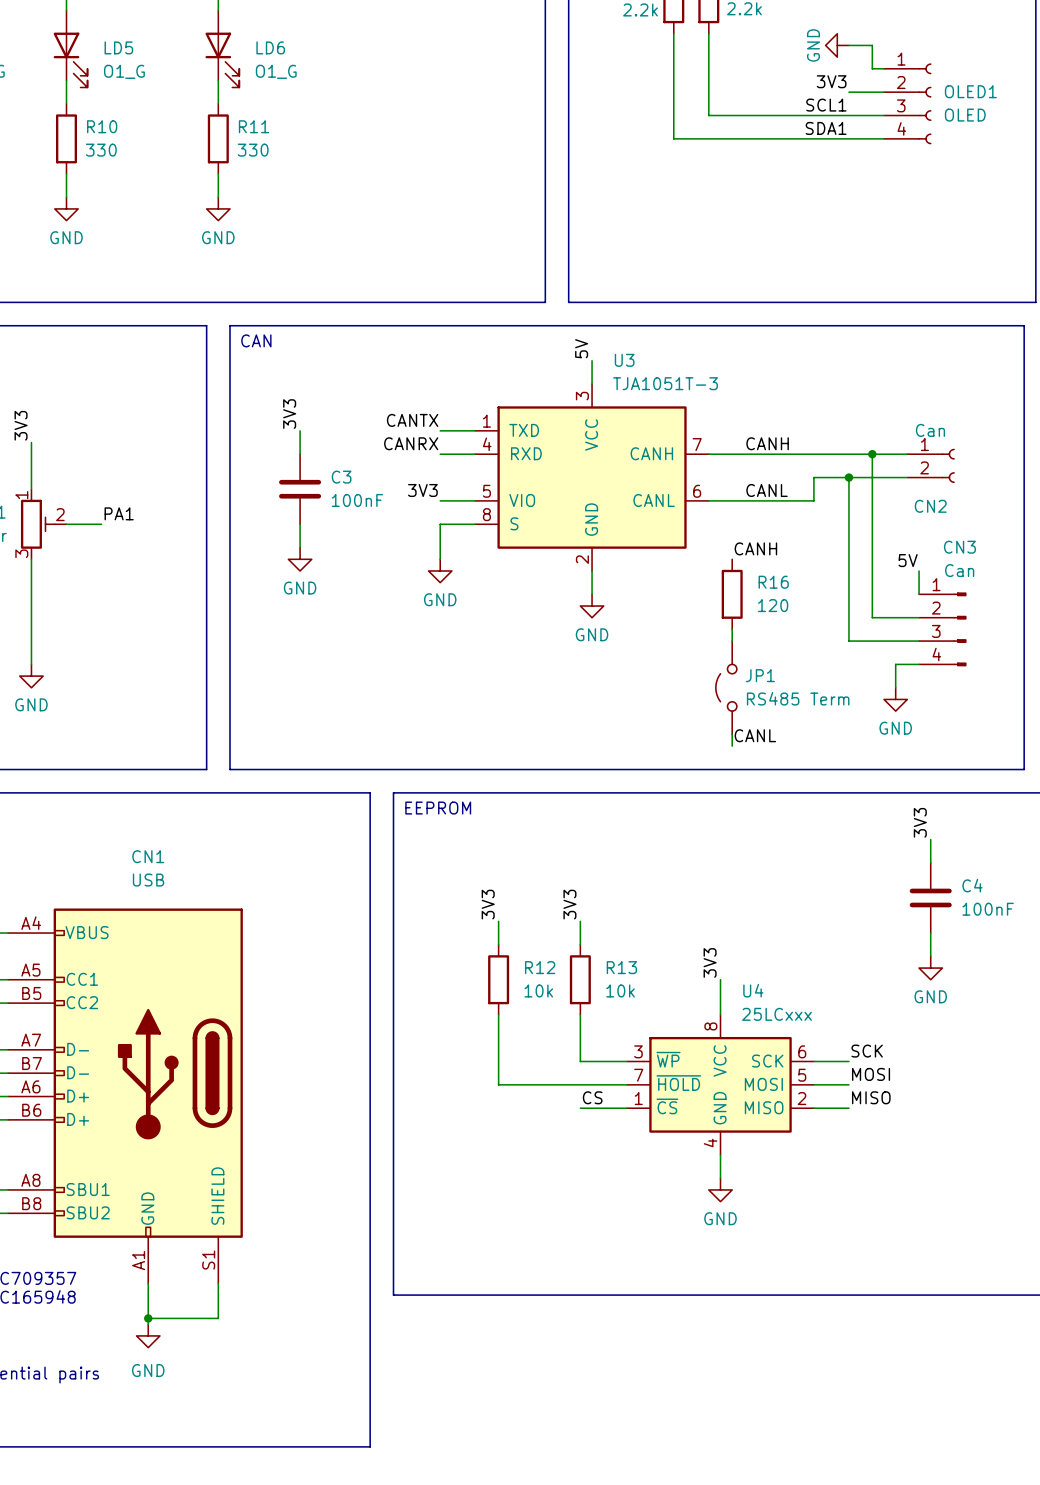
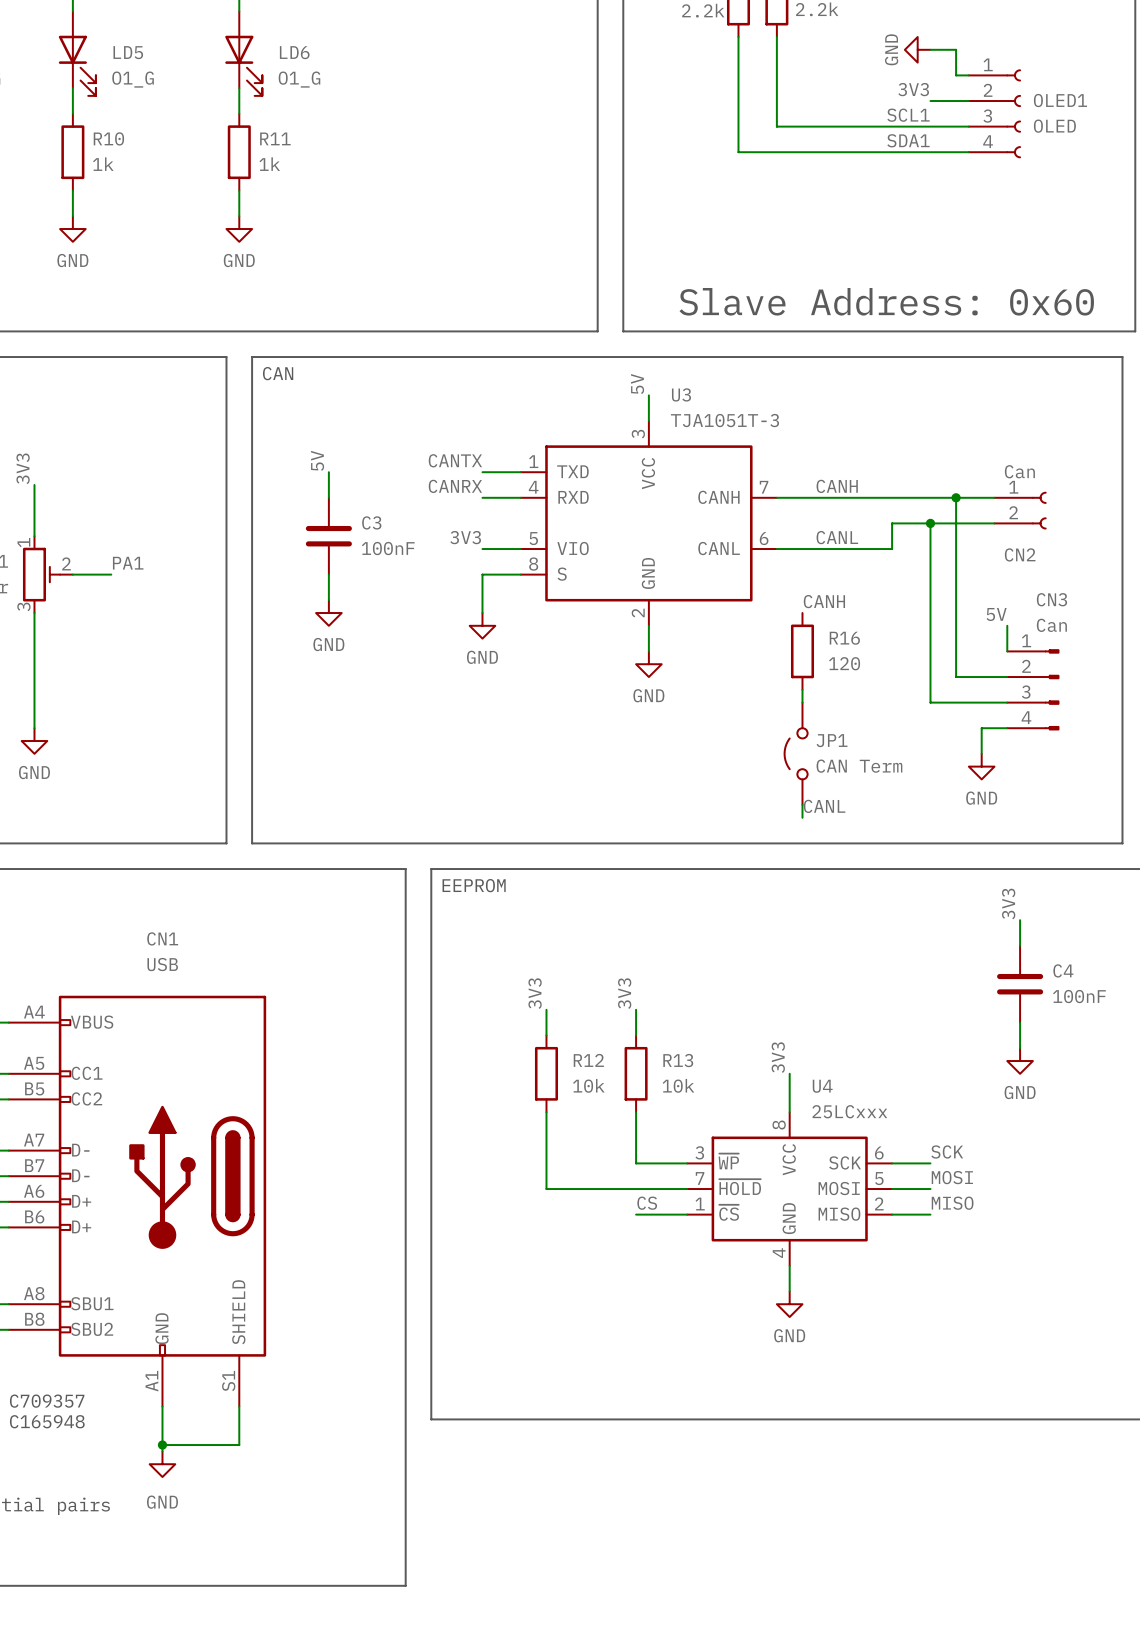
R10 value: 330 (101, 150) -> 1k (103, 164)
R11 value: 330 (253, 150) -> 1k (269, 164)
text: none -> Slave Address: 0x60 (886, 301)
label: 3V3 (289, 414) -> 5V (317, 460)
JP1 value: RS485 Term (798, 698) -> CAN Term (859, 766)

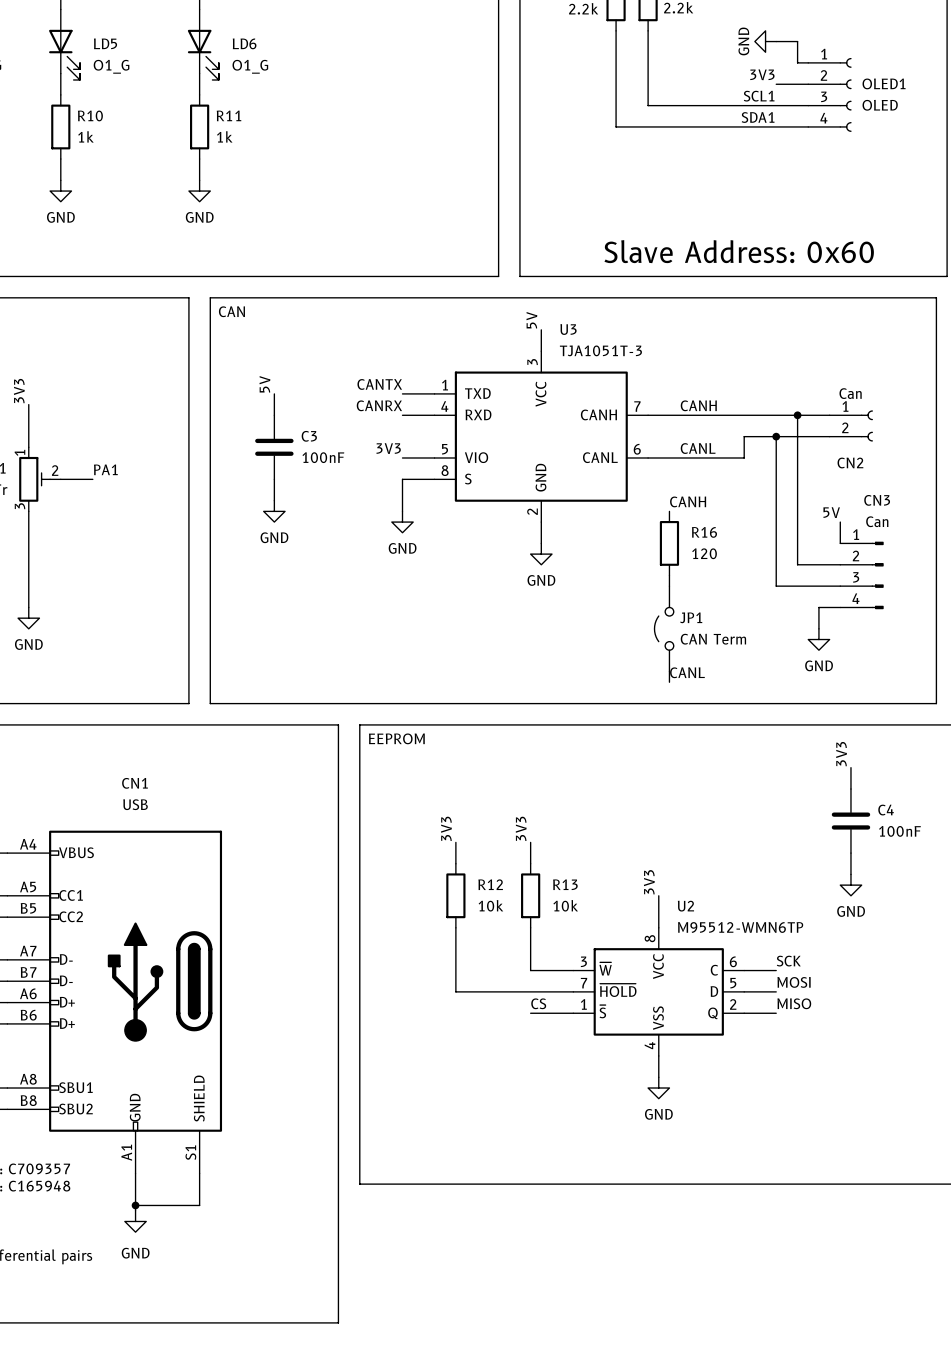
U4 name: U4 (822, 1086) -> U2 (685, 906)
U4 value: 25LCxxx (849, 1111) -> M95512-WMN6TP (740, 927)
U4 pin name: ~{WP} (728, 1161) -> ~{W} (605, 968)
U4 pin name: SCK (845, 1162) -> C (714, 970)
U4 pin name: MOSI (839, 1188) -> D (714, 991)
U4 pin name: ~{CS} (729, 1212) -> ~{S} (602, 1011)
U4 pin name: MISO (839, 1214) -> Q (712, 1013)
U4 pin name: GND (789, 1218) -> VSS (658, 1018)

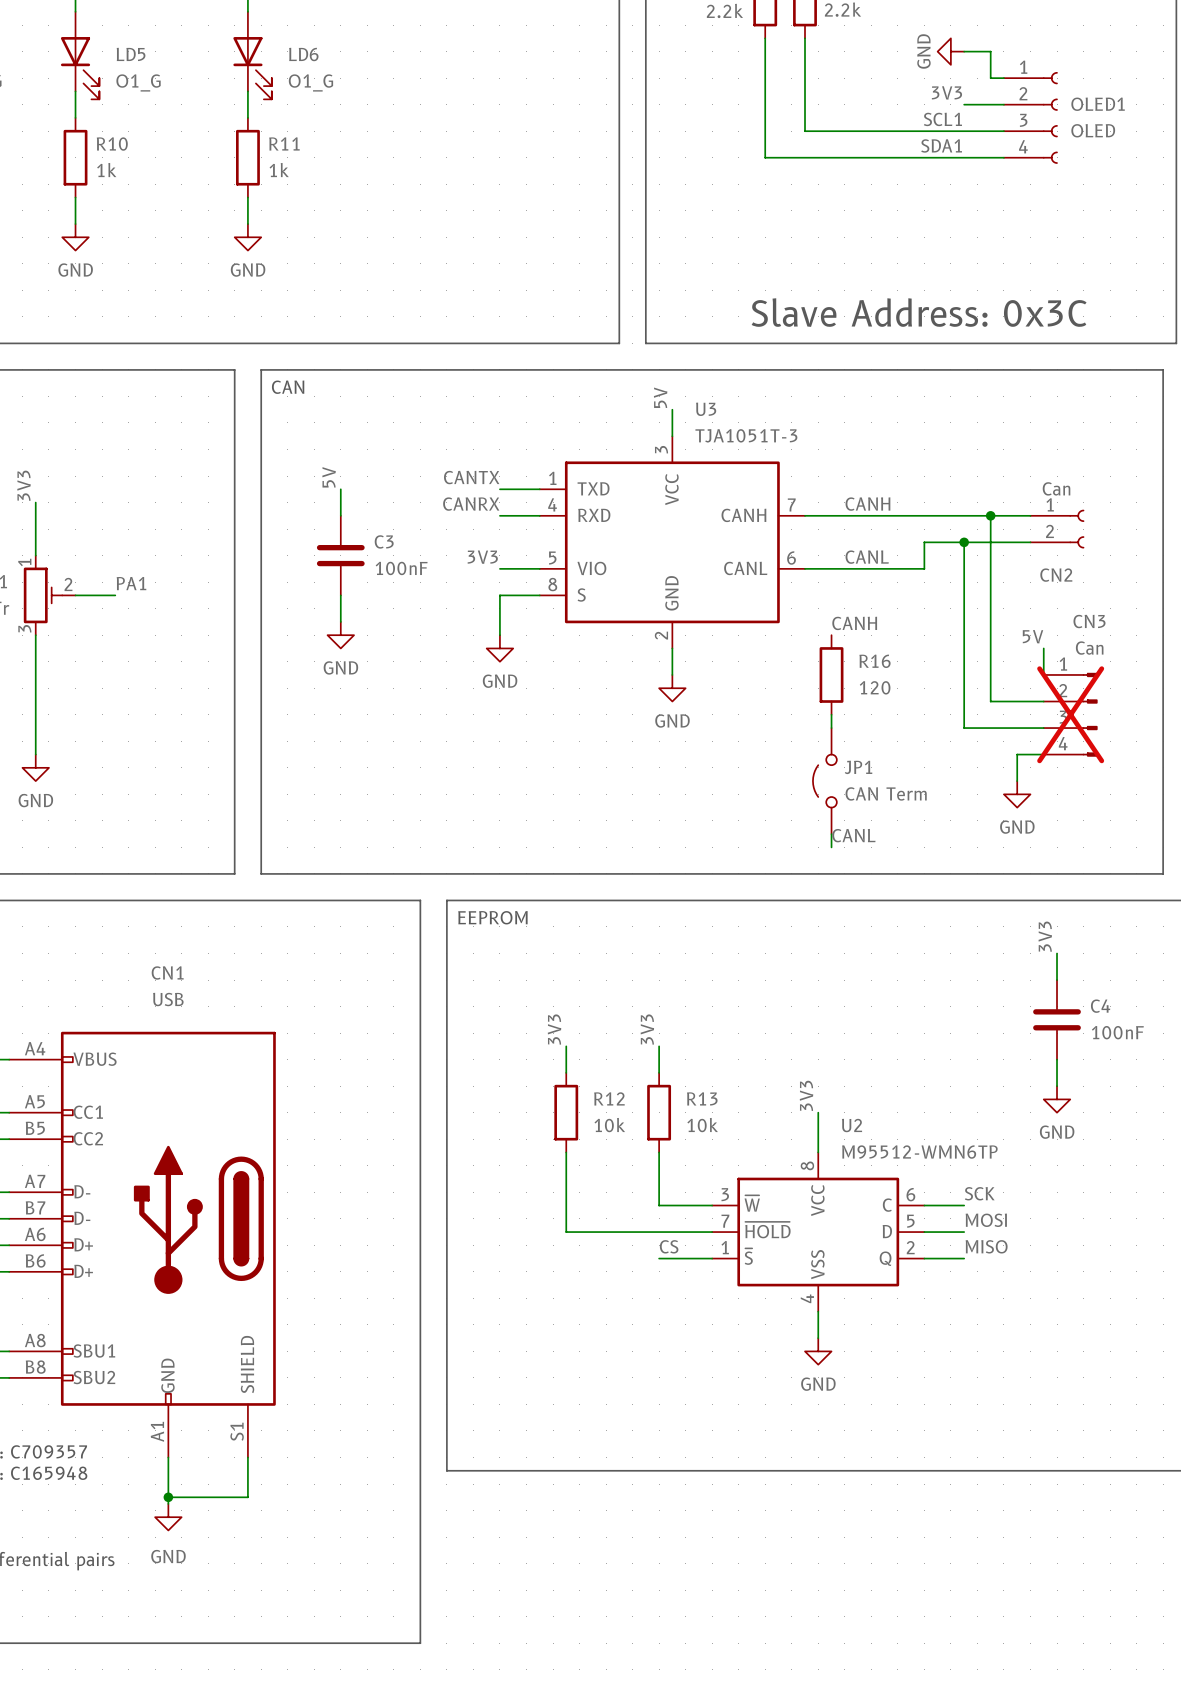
text: Slave Address: 0x60 (739, 251) -> Slave Address: 0x3C (919, 312)
CN3 do-not-place cross: none -> (1070, 714)

